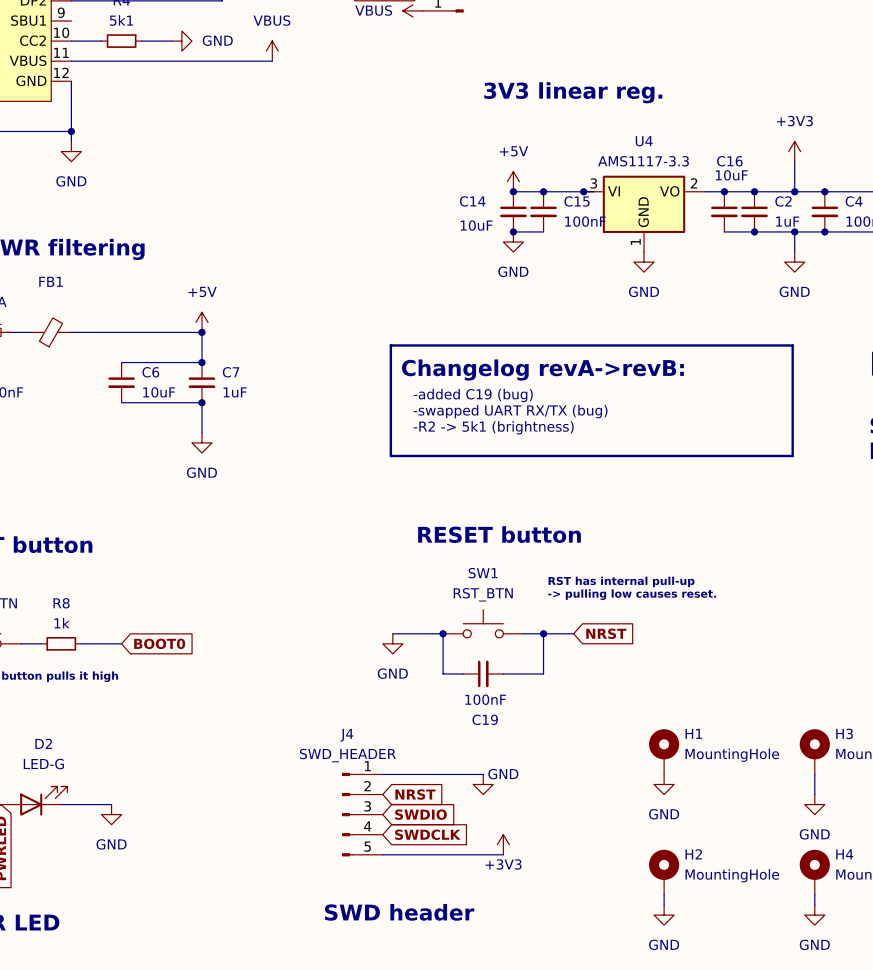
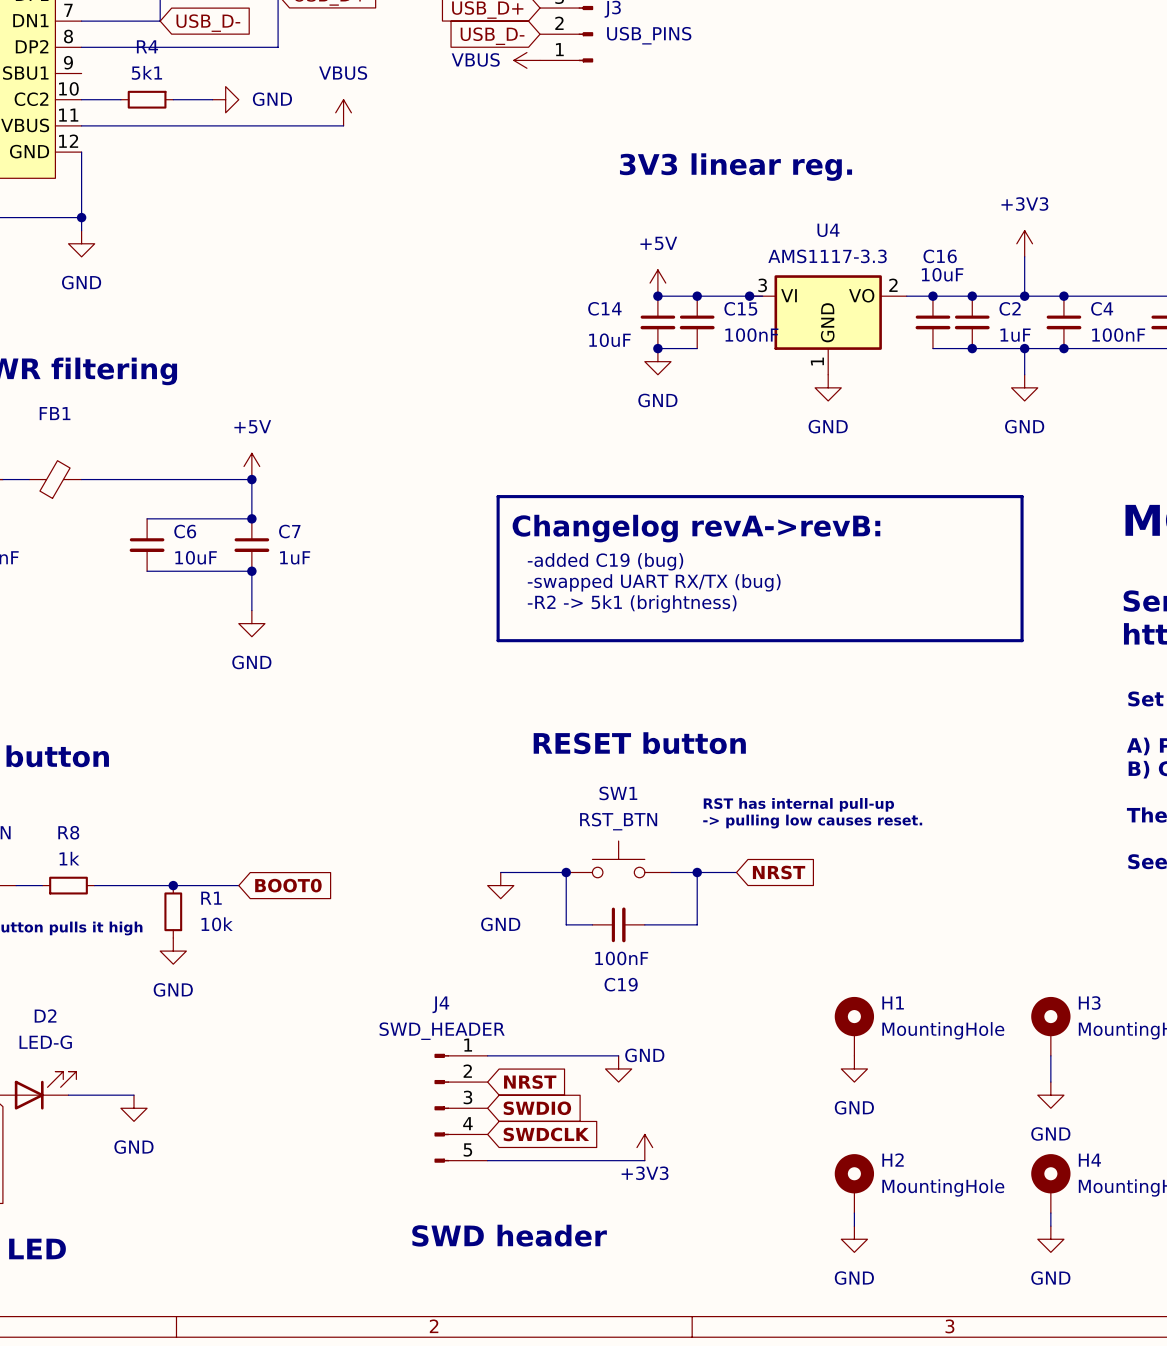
wire: none -> (147, 885) (238, 885)
junction: none -> (173, 885)
global label position: BOOT0 (159, 643) -> BOOT0 (288, 885)
R1: none -> 10k (173, 911)
power symbol: none -> GND (173, 951)

